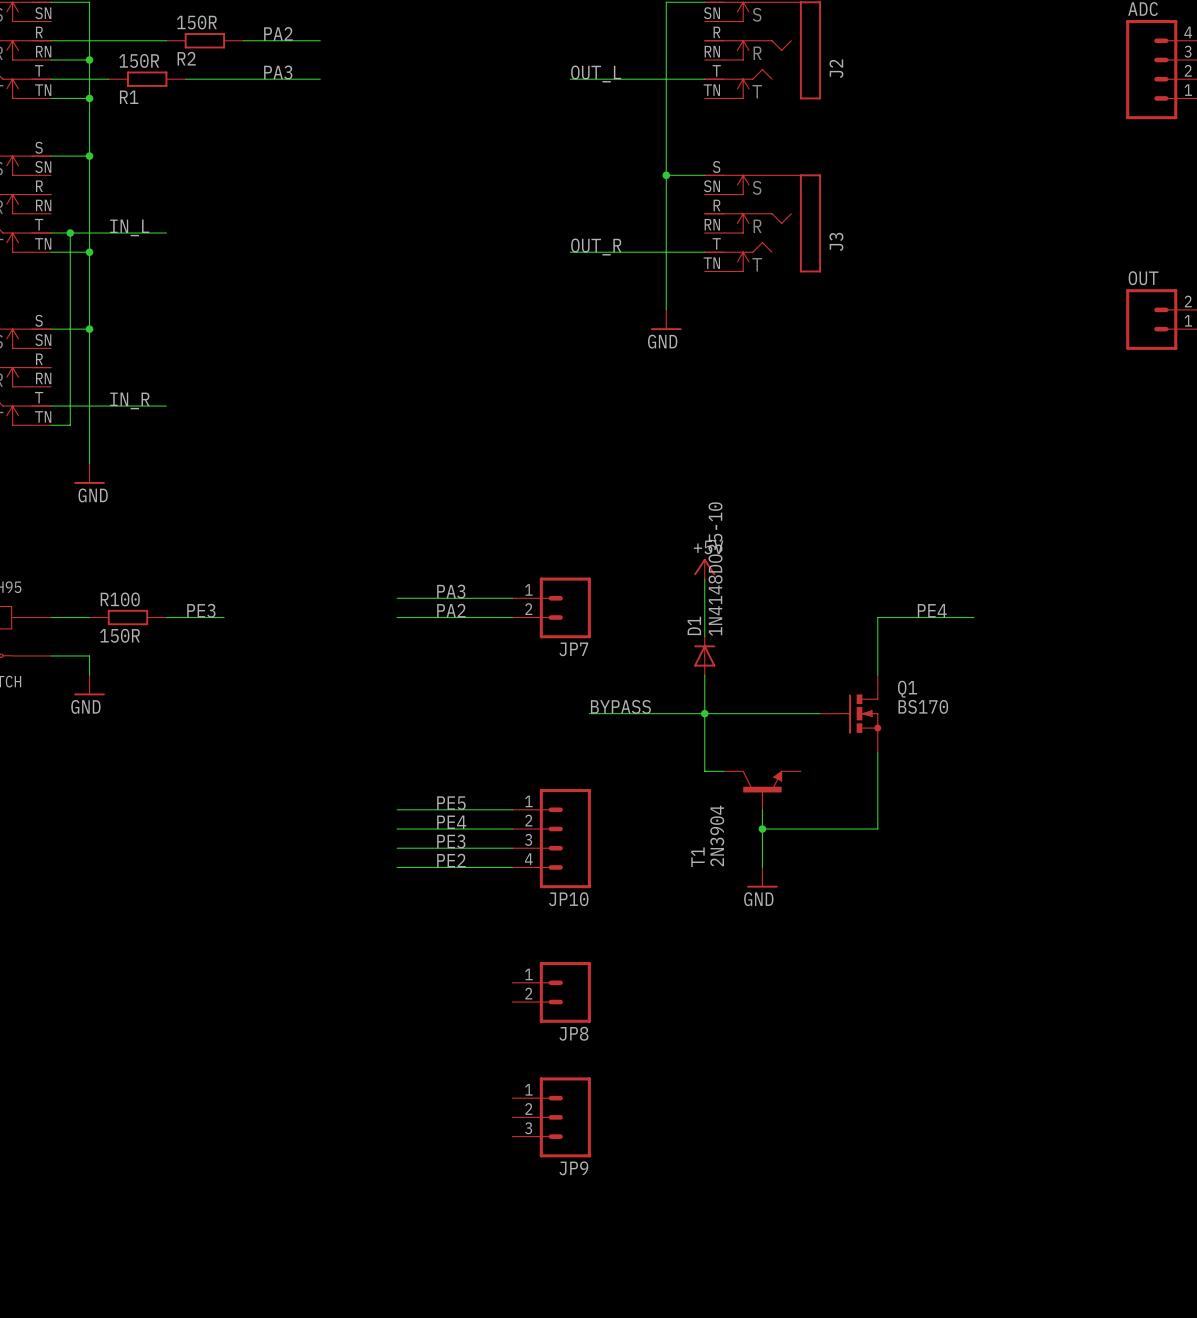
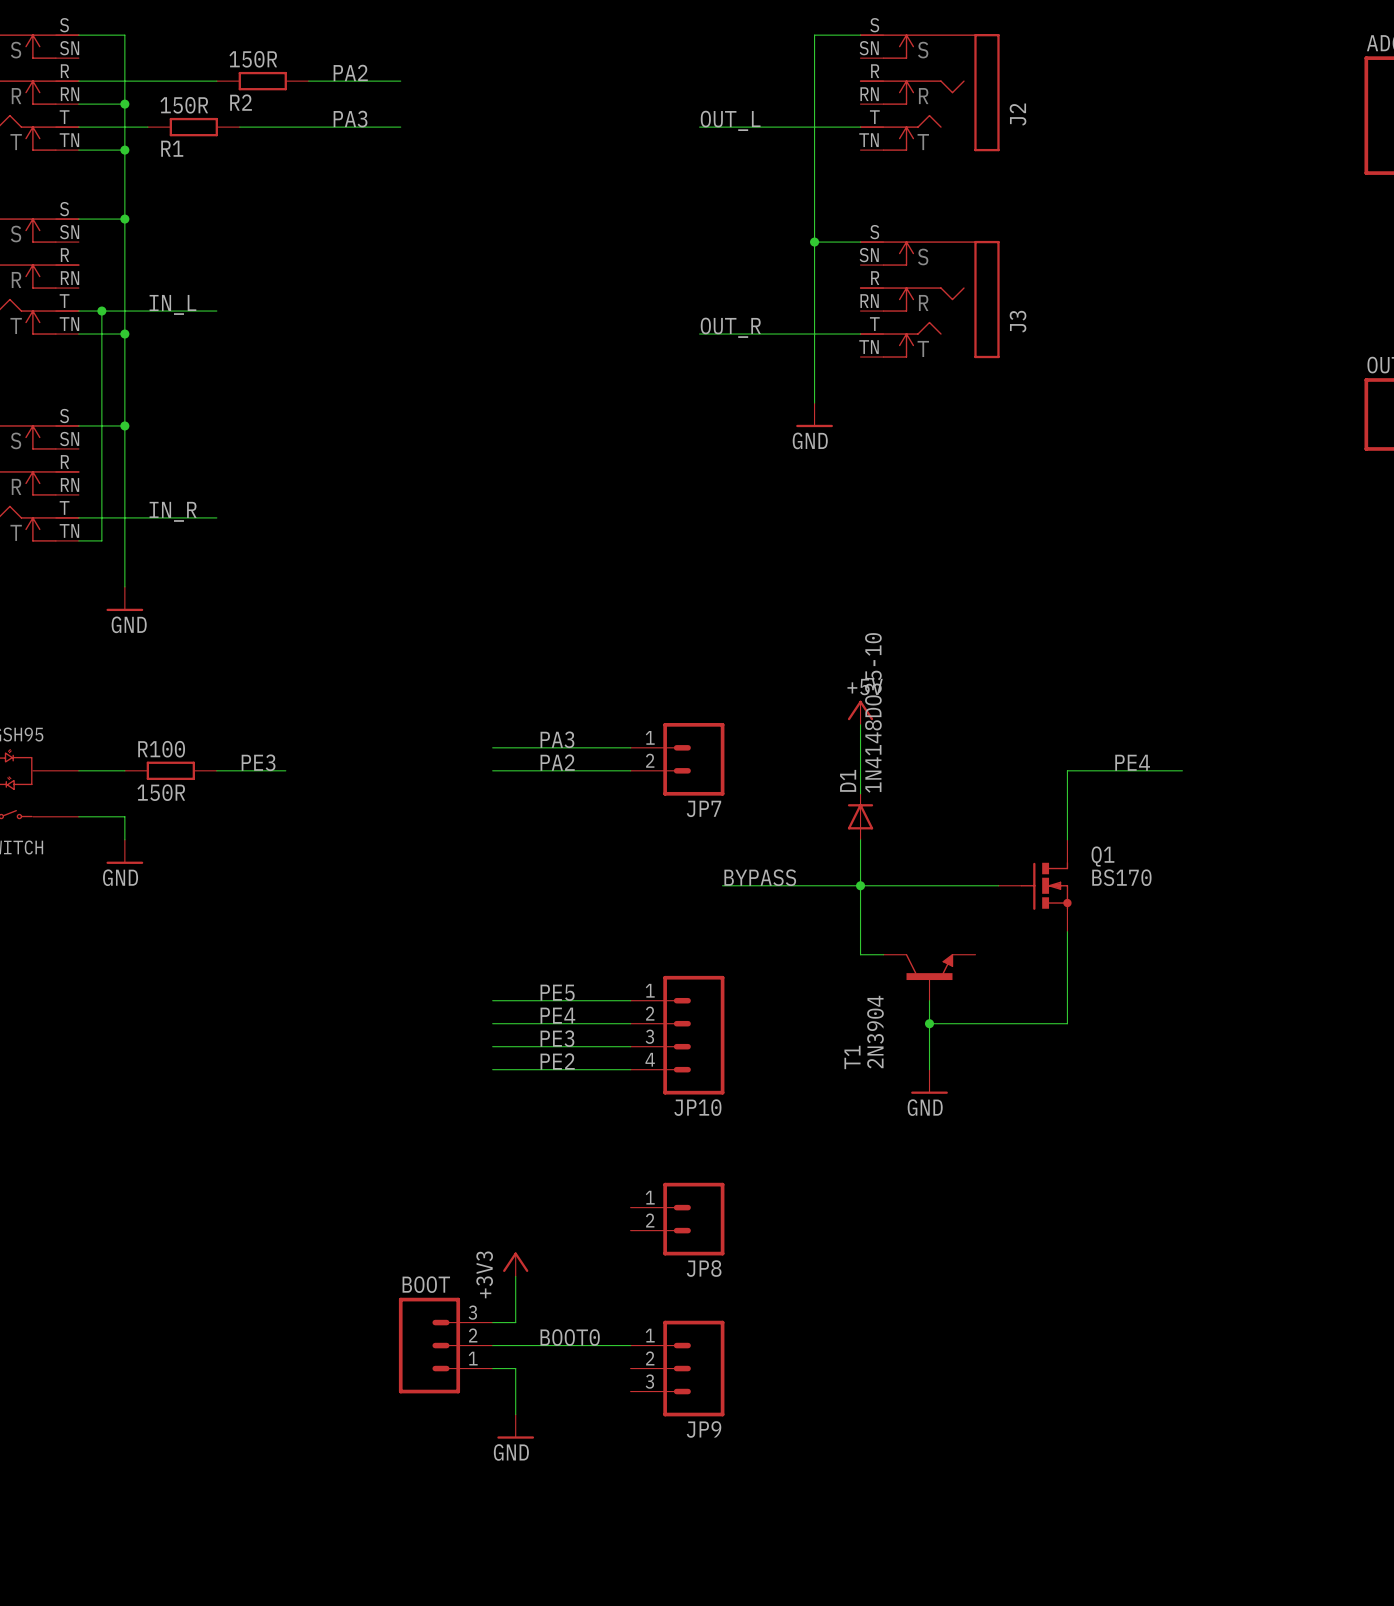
power symbol: none -> +3V3 (515, 1264)
wire: none -> (515, 1276) (515, 1322) (492, 1322)
label: none -> BOOT0 (570, 1337)
BOOT: none -> (445, 1345)
wire: none -> (492, 1345) (630, 1345)
wire: none -> (492, 1368) (515, 1368) (515, 1414)
power symbol: none -> GND (515, 1426)

